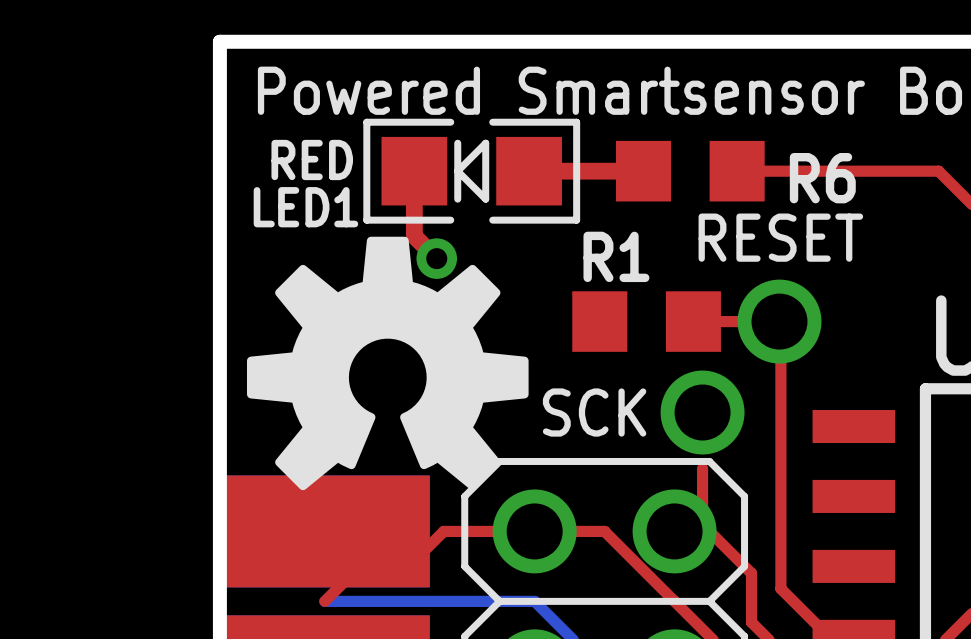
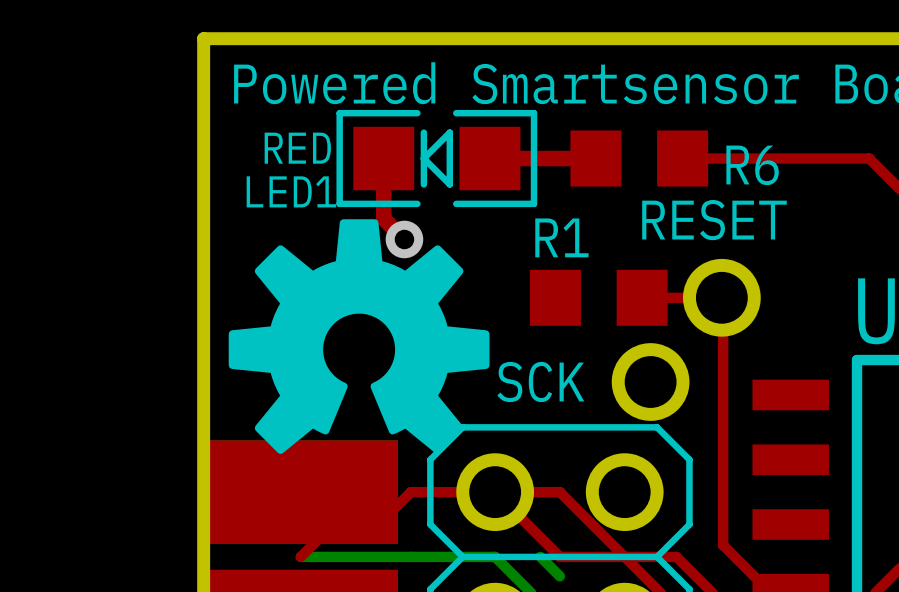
top track: (702, 468) (702, 524) (751, 573) (751, 622) -> (495, 492) (559, 556) (676, 556) (695, 576)
bottom track: none -> (540, 556) (559, 576)

